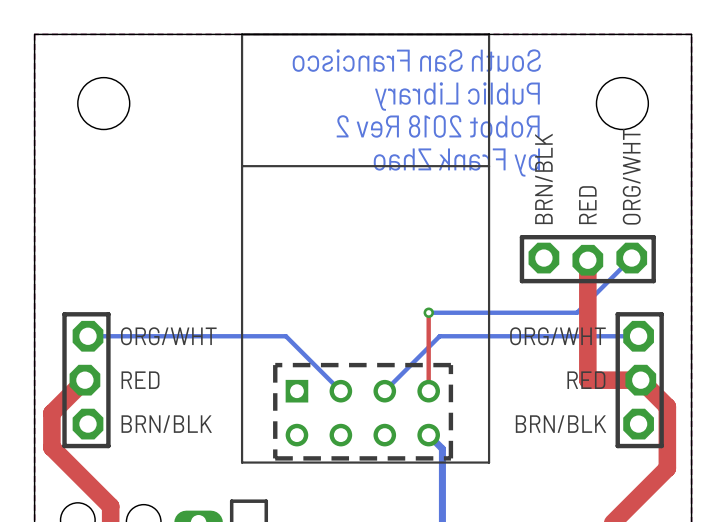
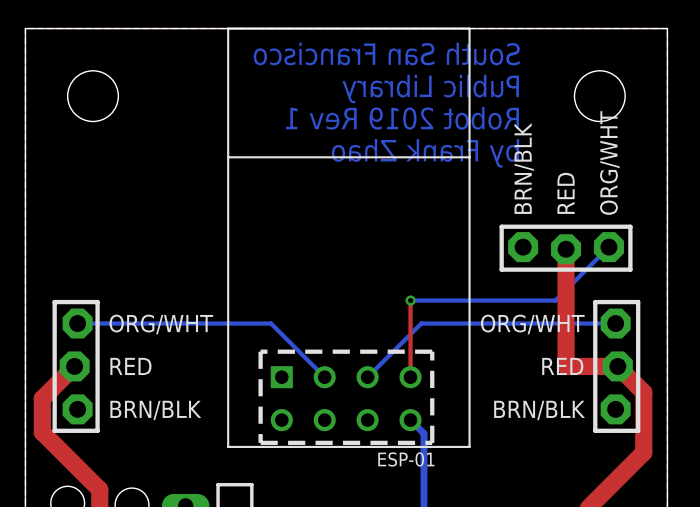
drawing shape: [292, 49, 541, 177] -> [253, 42, 520, 168]
text: none -> ESP-01 (406, 459)

